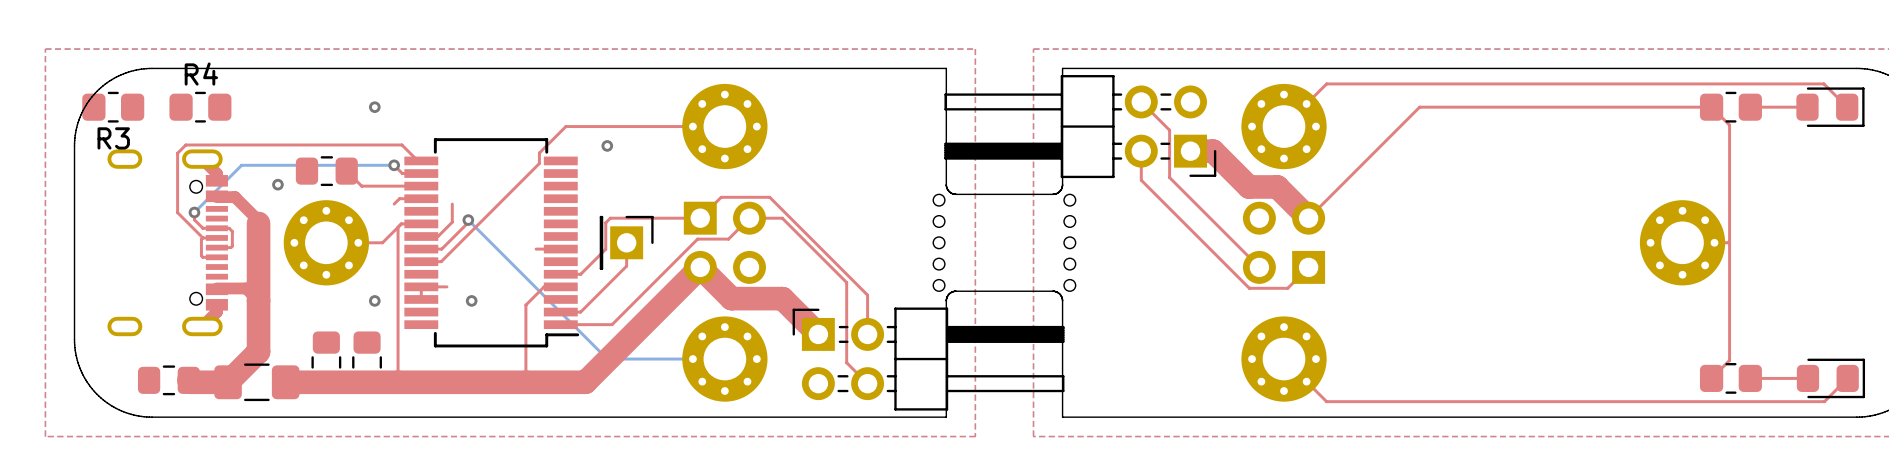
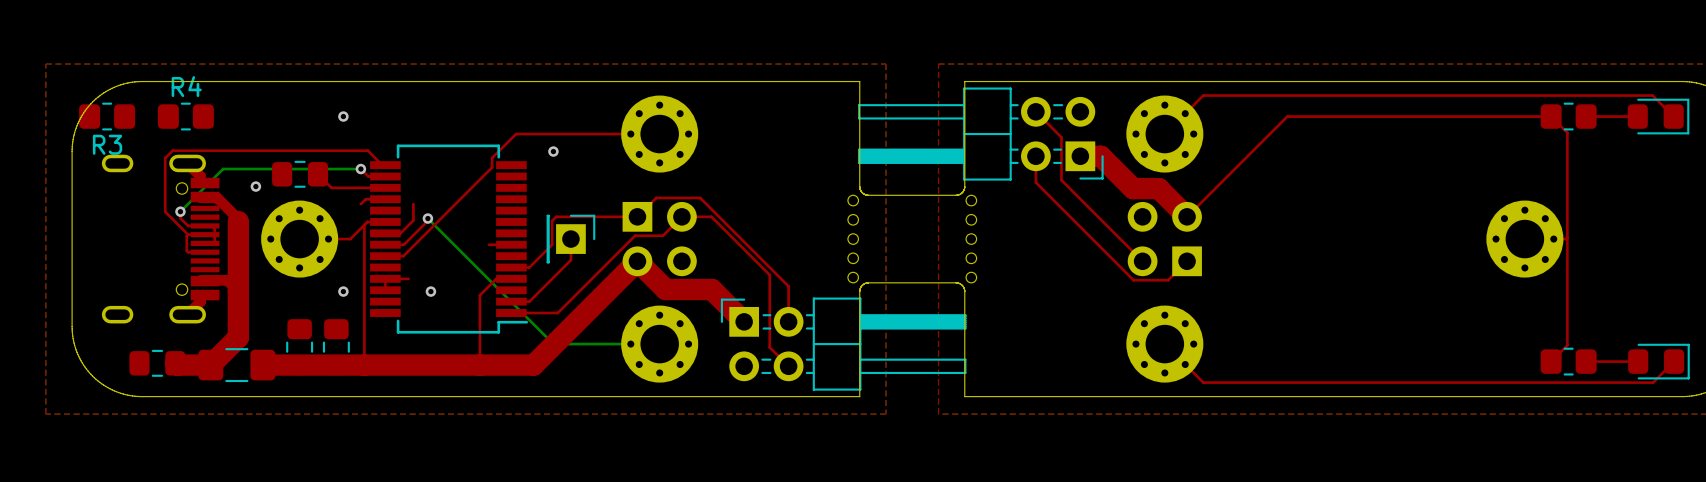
part footprint: [107, 149, 228, 337] -> [101, 154, 220, 324]

